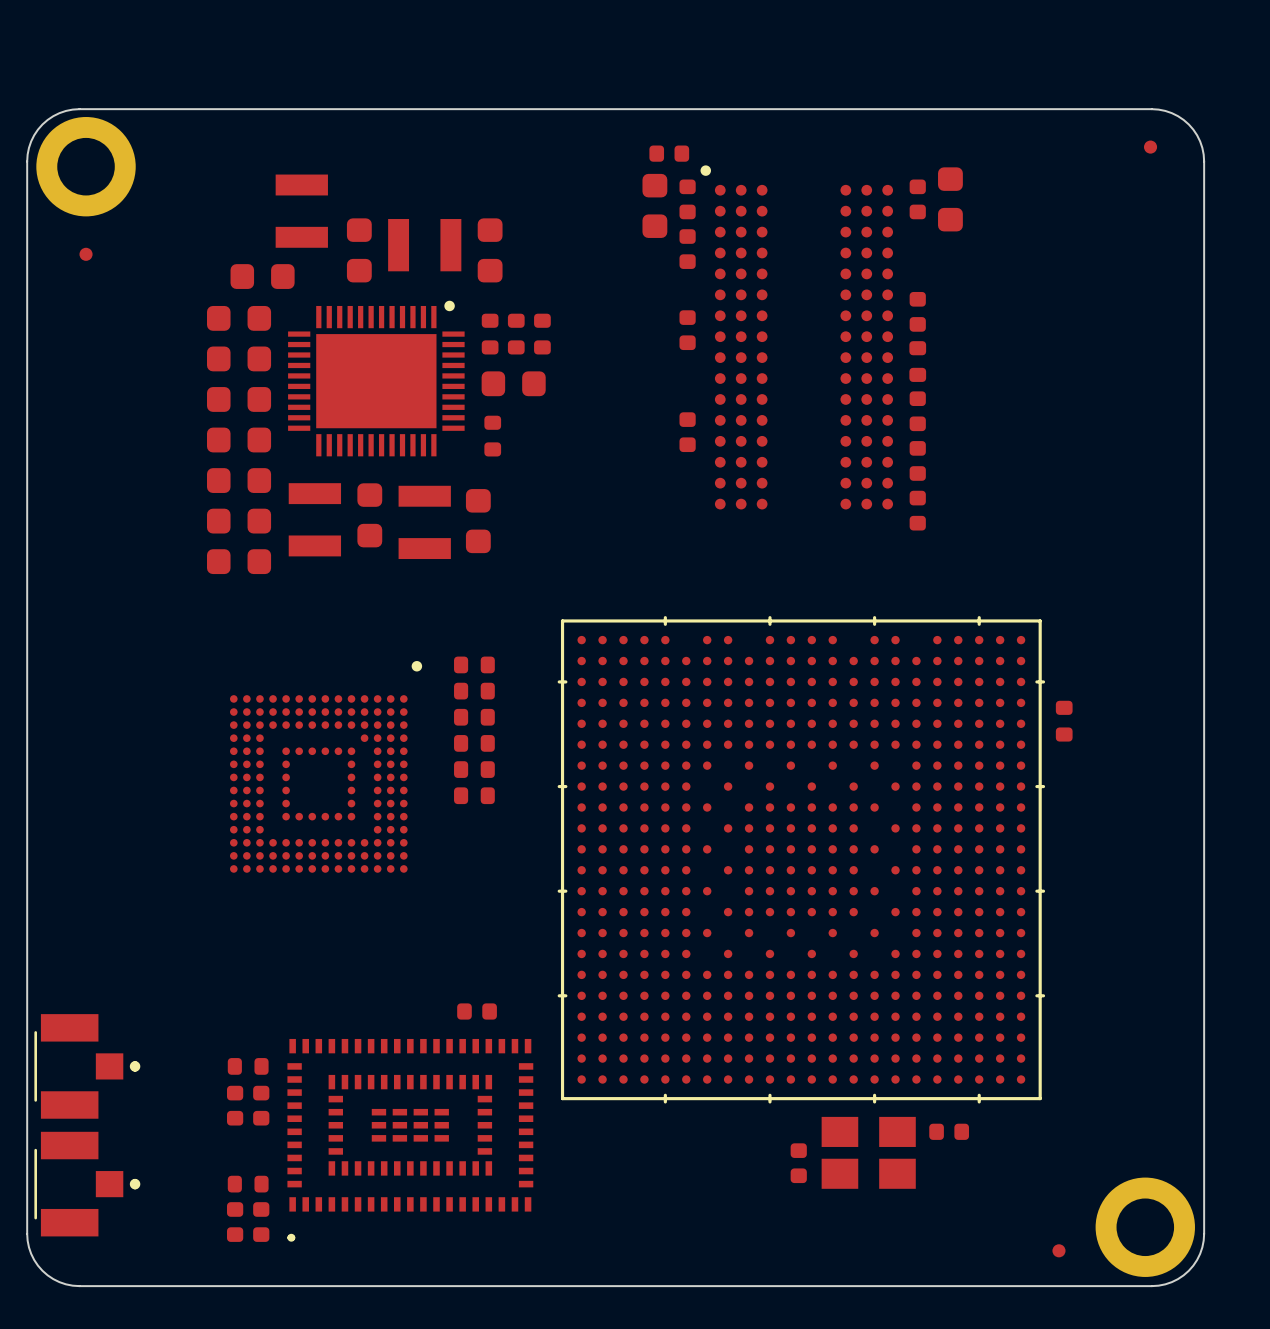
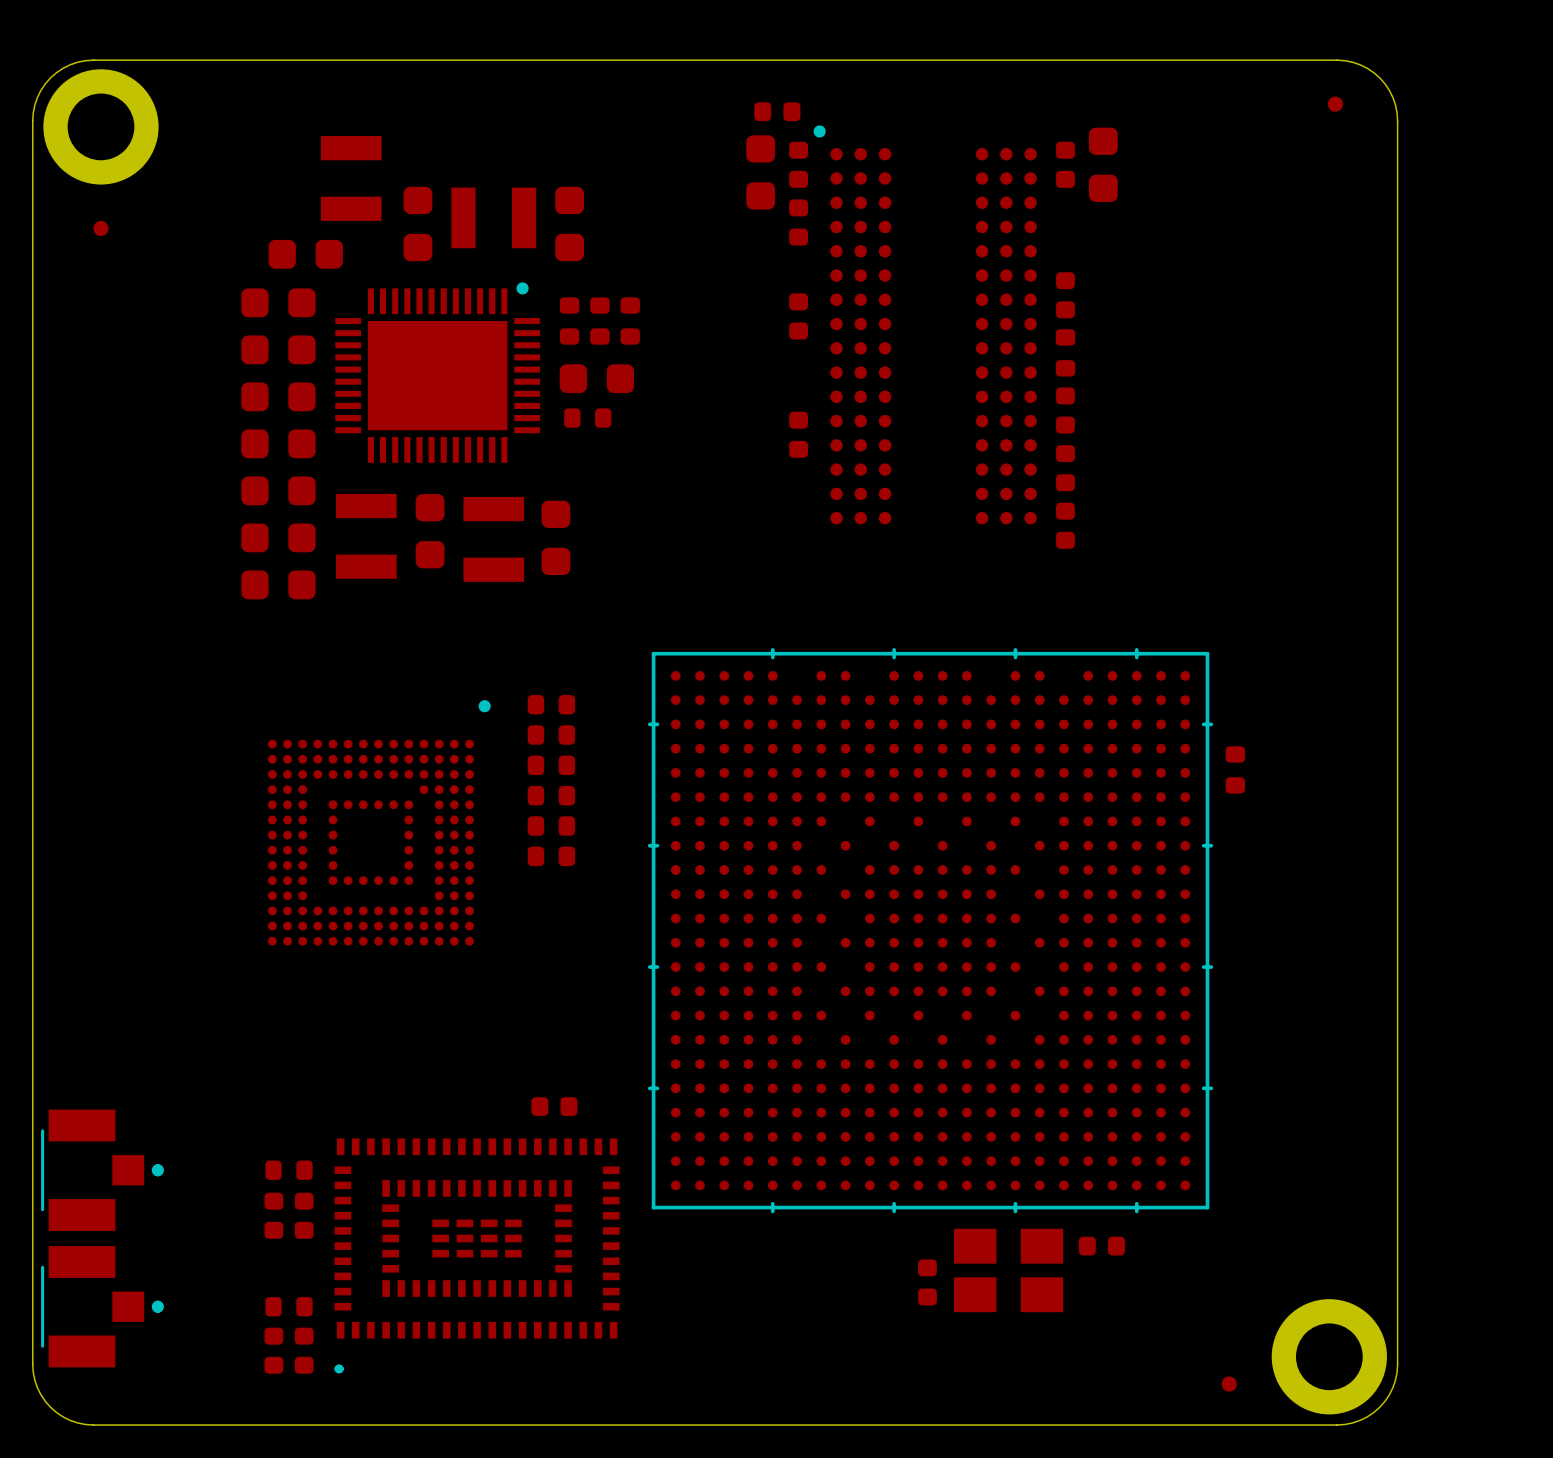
part rotation: 0° (492, 436) -> 90° clockwise (587, 418)

